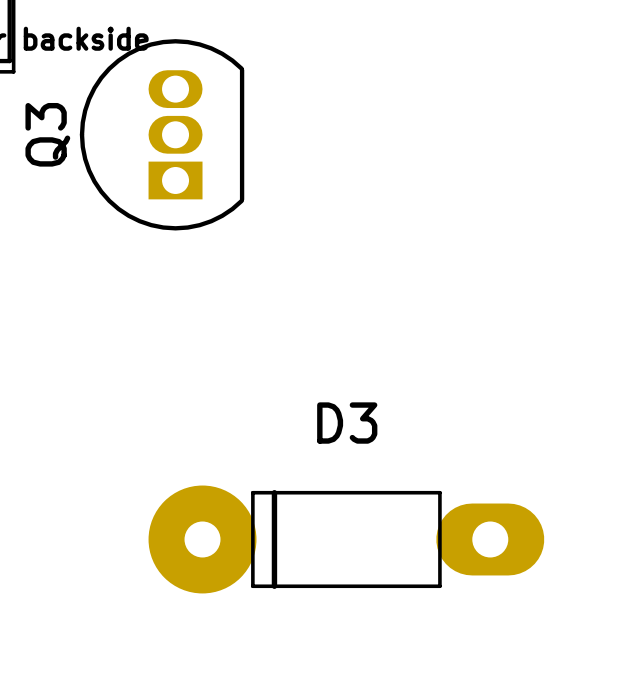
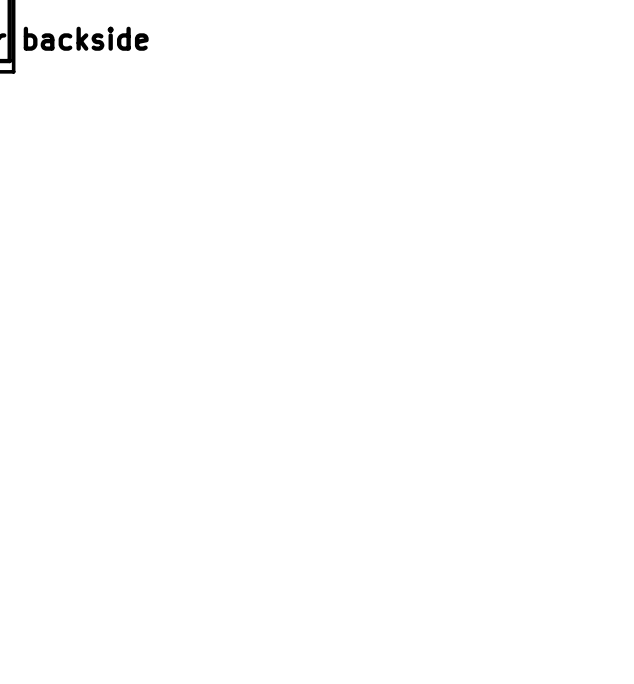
Q3: (162, 134) -> none
D3: (346, 539) -> none

